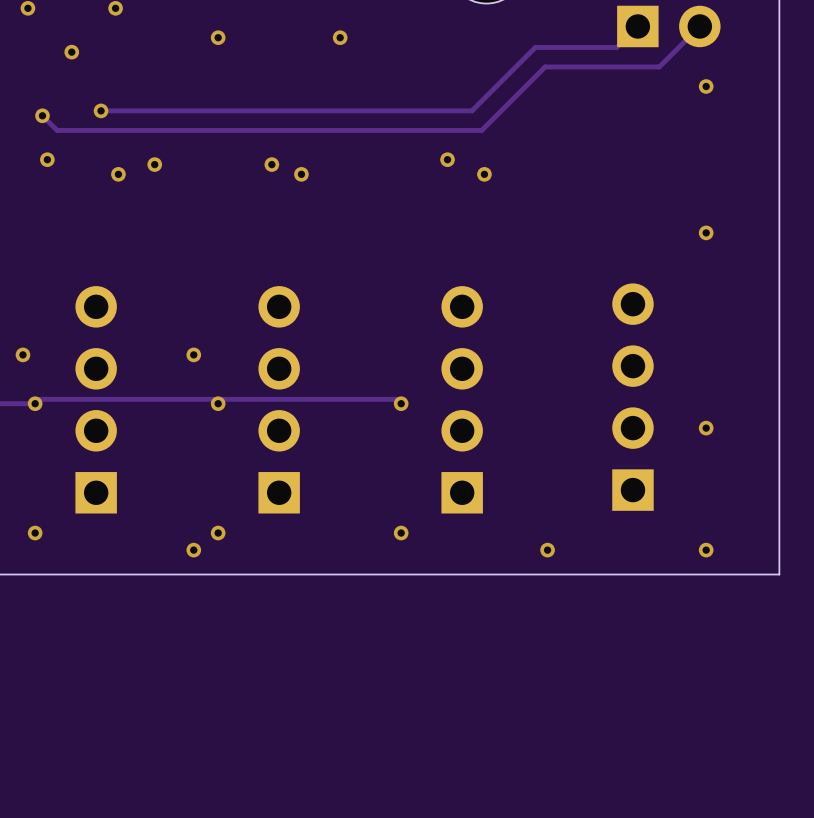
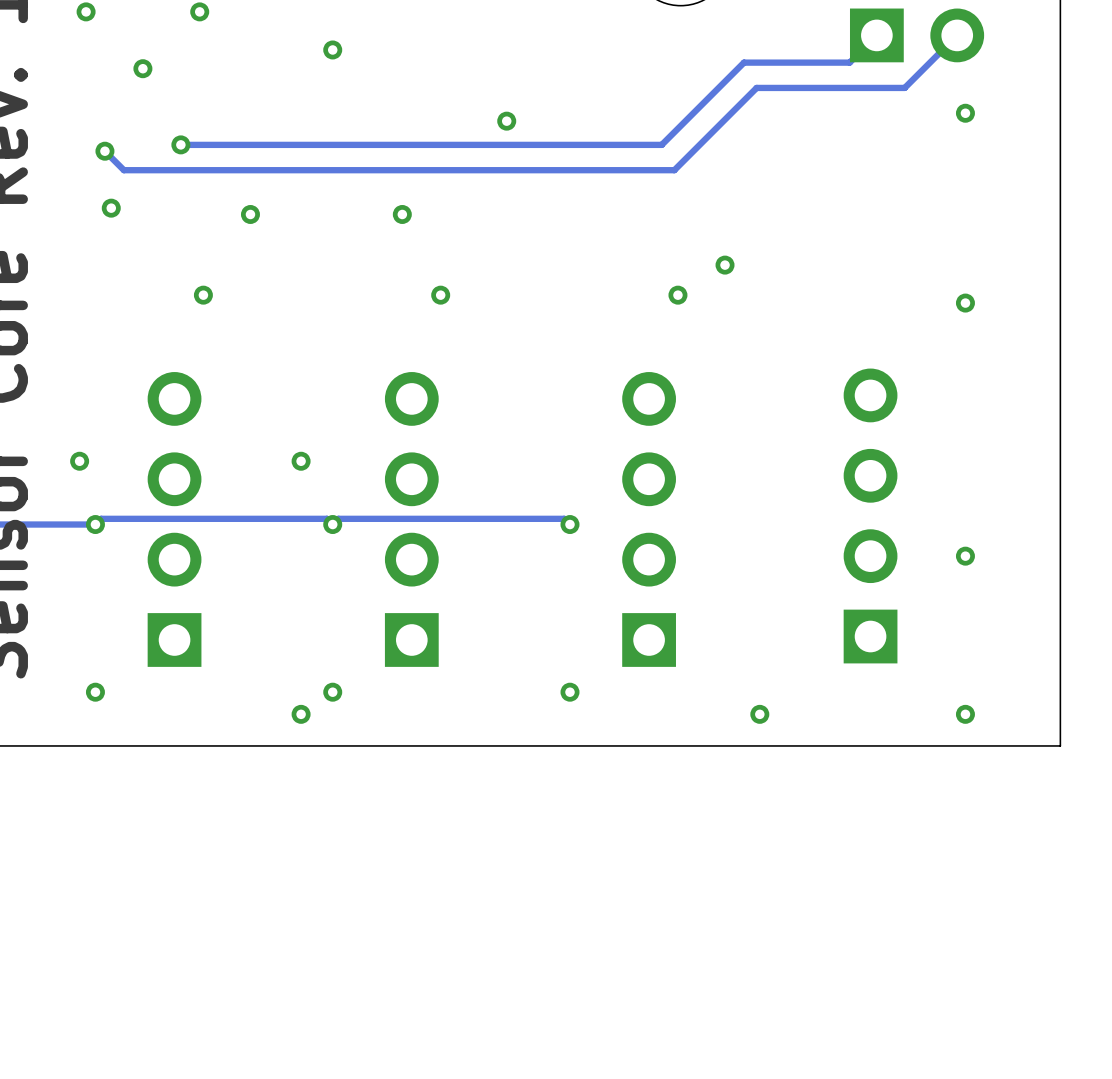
via: (340, 37) -> none
via: none -> (506, 121)
via: (447, 159) -> none
via position: (118, 174) -> (203, 295)
via: (301, 174) -> none
via: (484, 174) -> none
via: none -> (725, 265)
via: none -> (440, 295)
via: none -> (677, 295)

